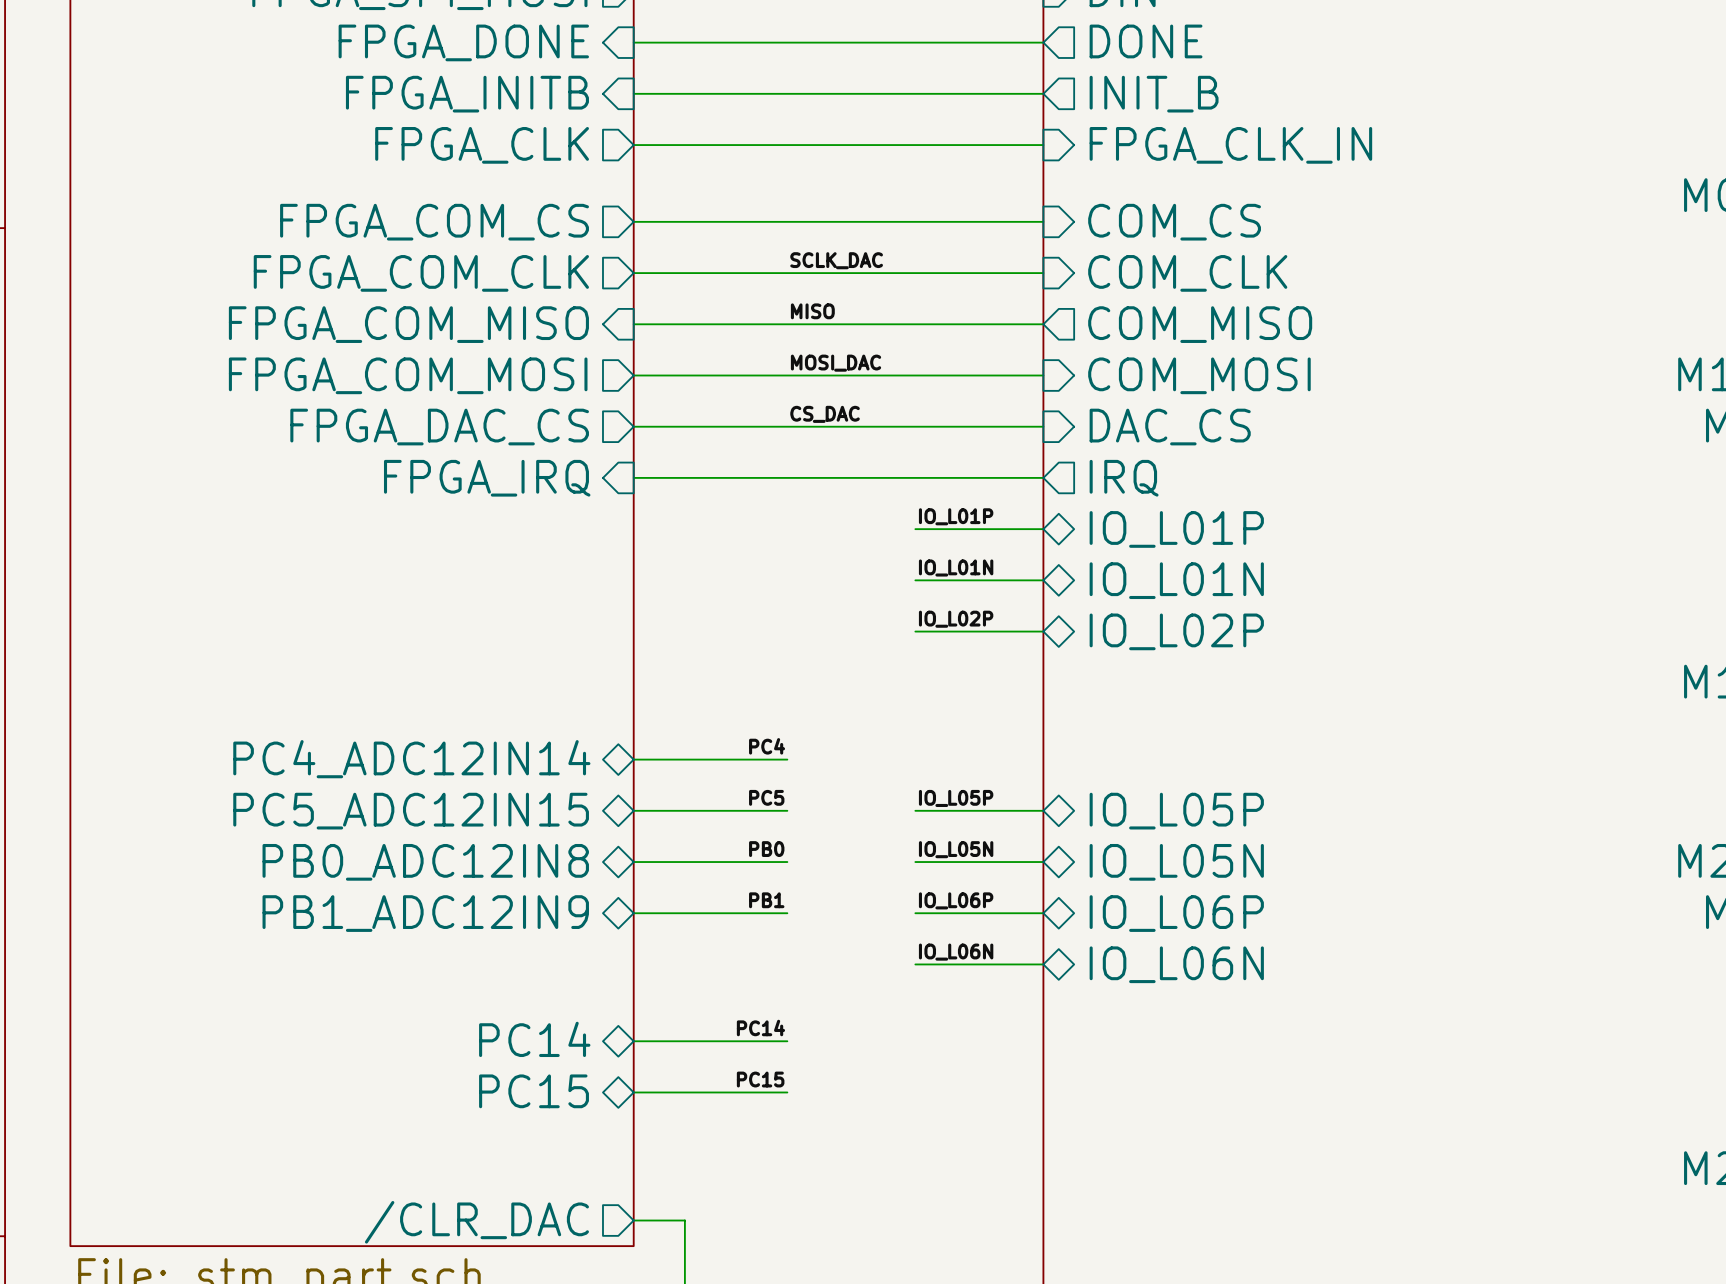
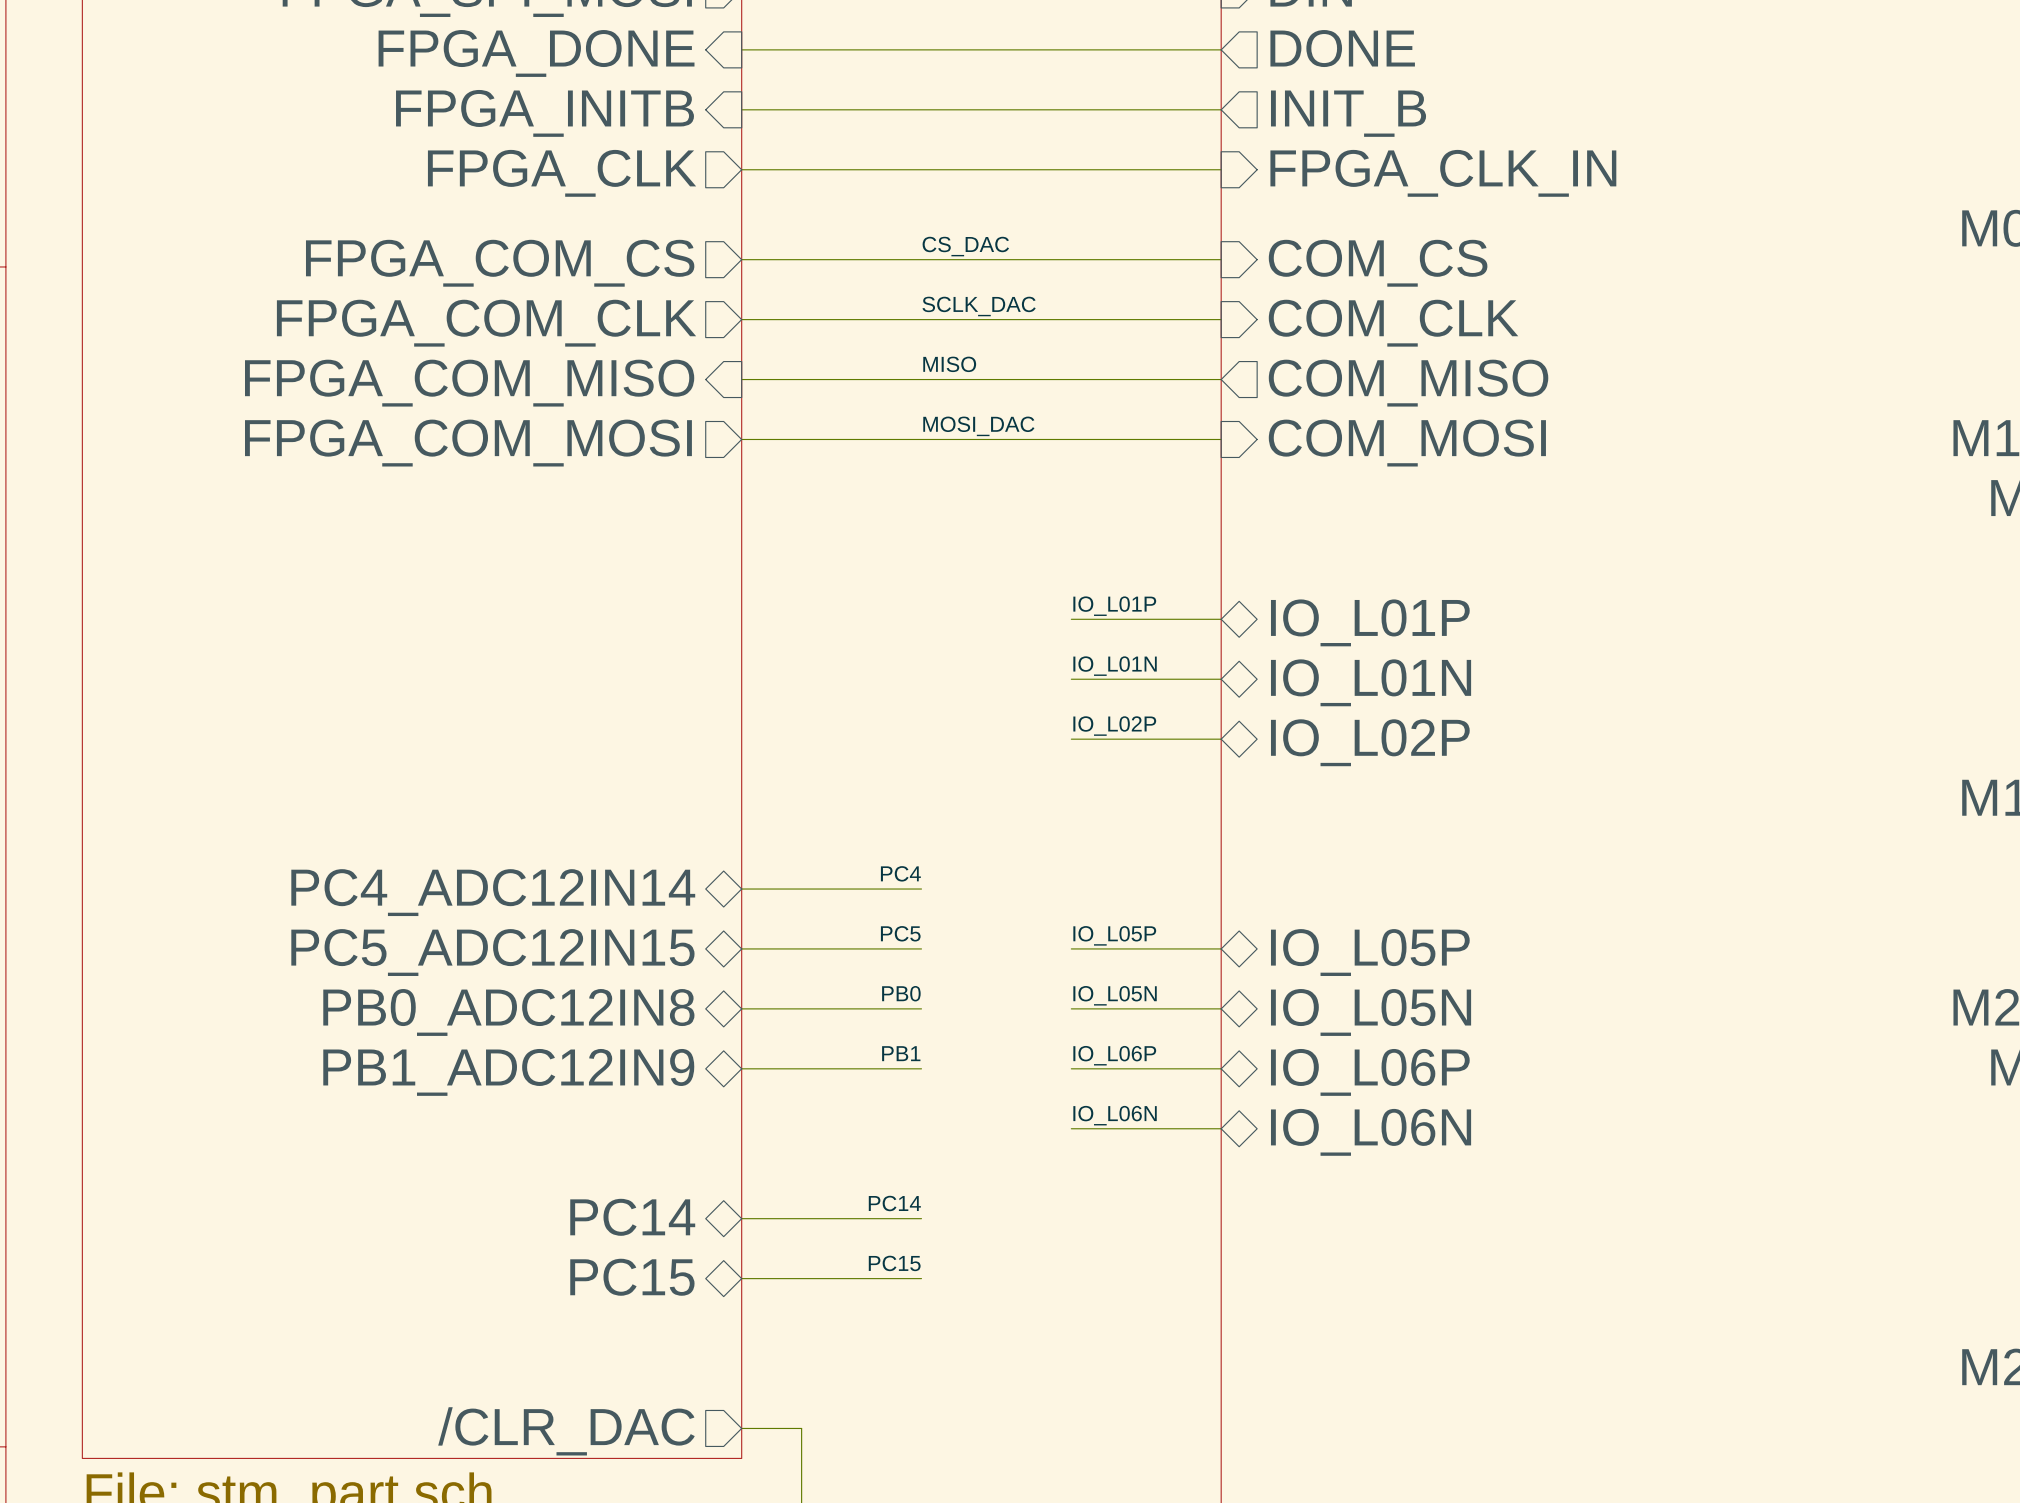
label position: CS_DAC (825, 414) -> CS_DAC (965, 246)
wire: (633, 426) (1043, 426) -> none
sheet pin: FPGA_DAC_CS (439, 427) -> none
sheet pin: DAC_CS (1170, 427) -> none
wire: (633, 477) (1043, 477) -> none
sheet pin: FPGA_IRQ (487, 478) -> none
sheet pin: IRQ (1124, 478) -> none

